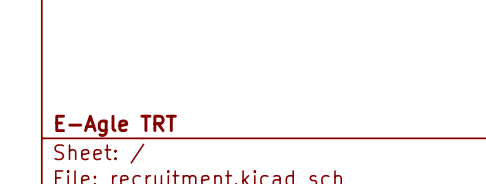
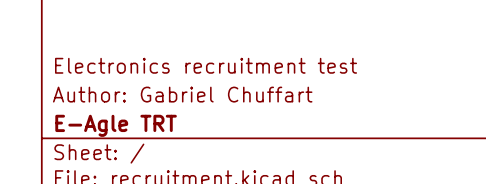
title block: none -> Electronics recruitment test (206, 65)
title block: none -> Author: Gabriel Chuffart (182, 94)

